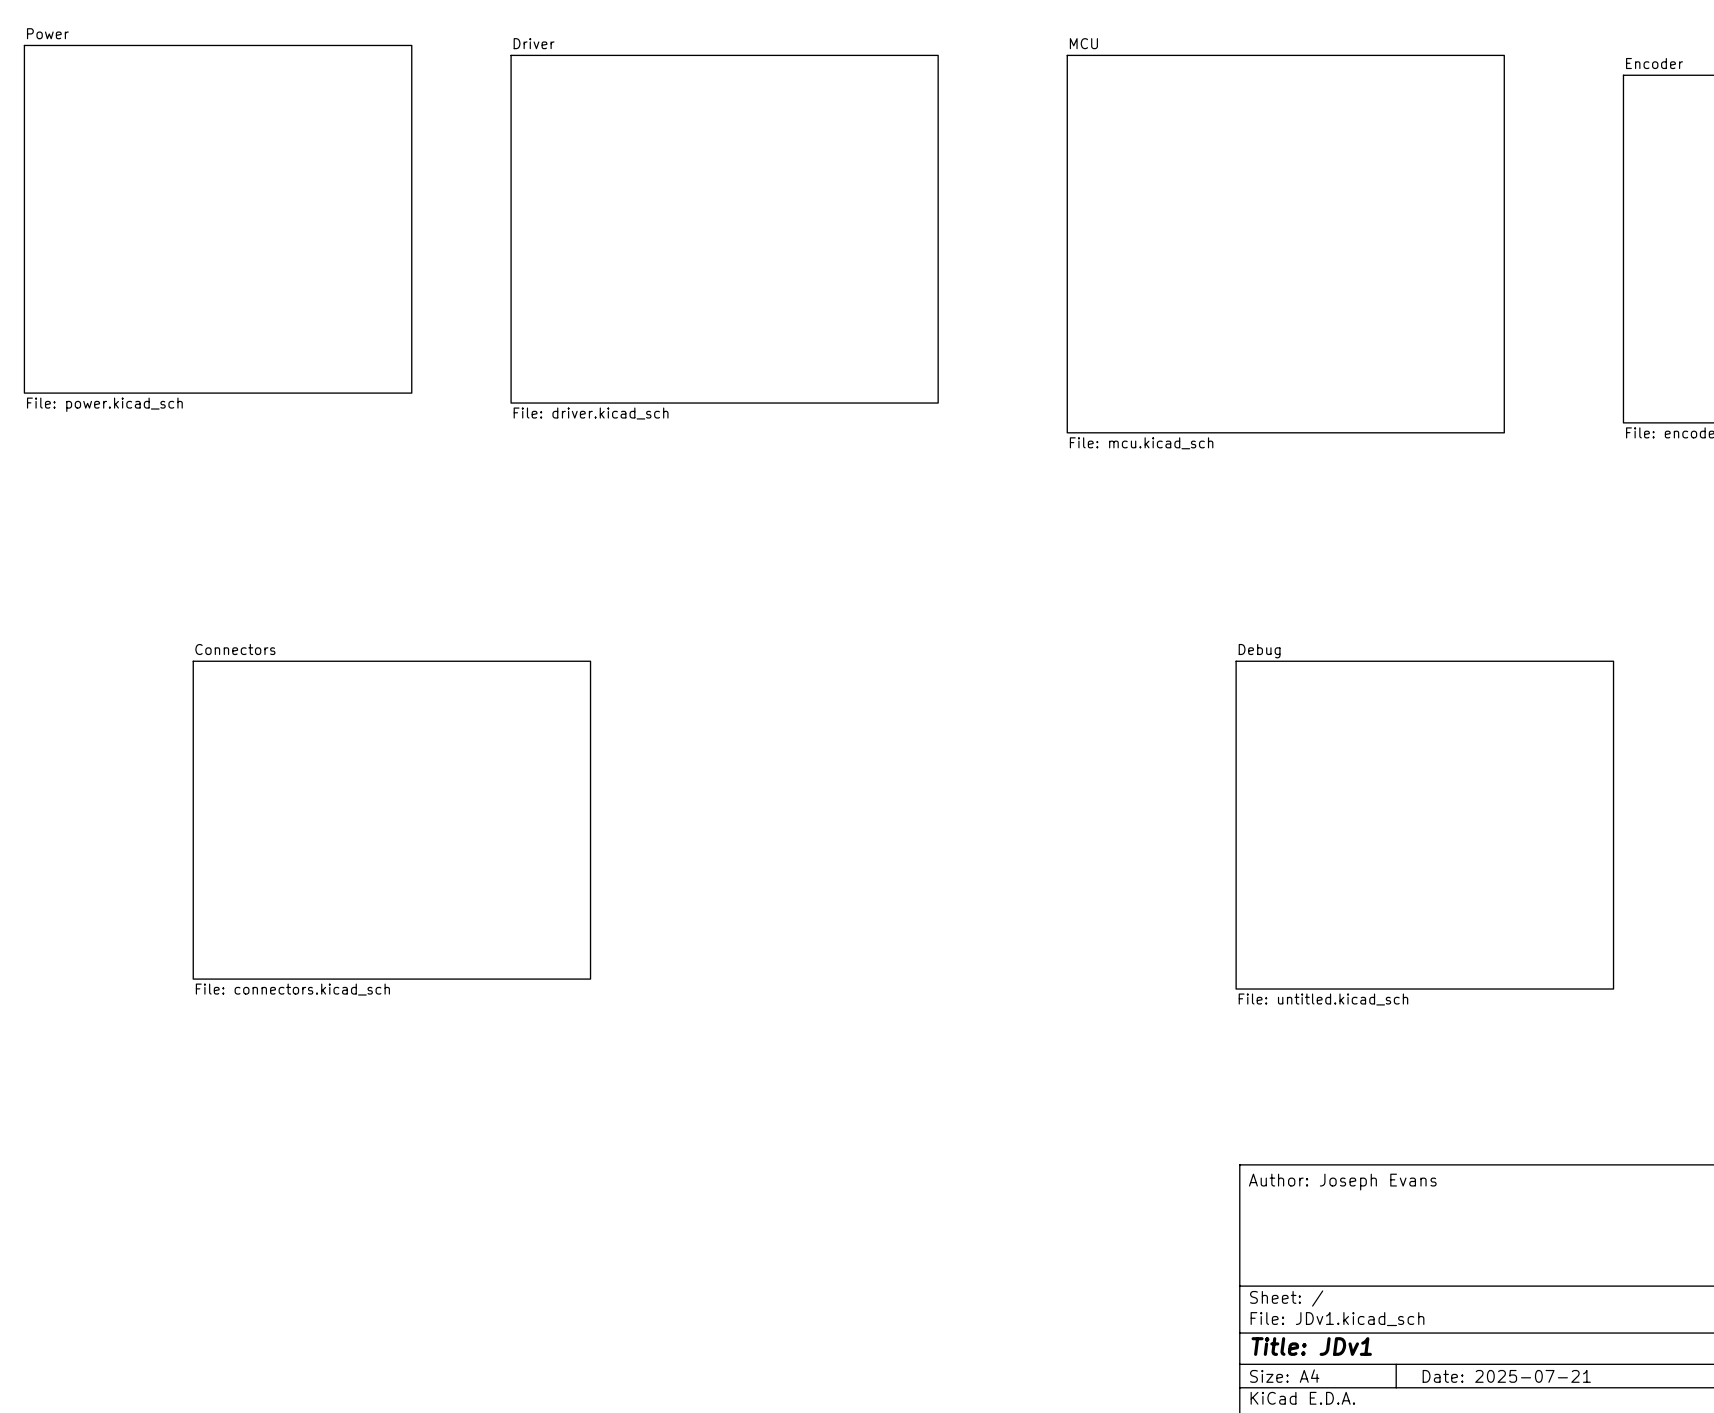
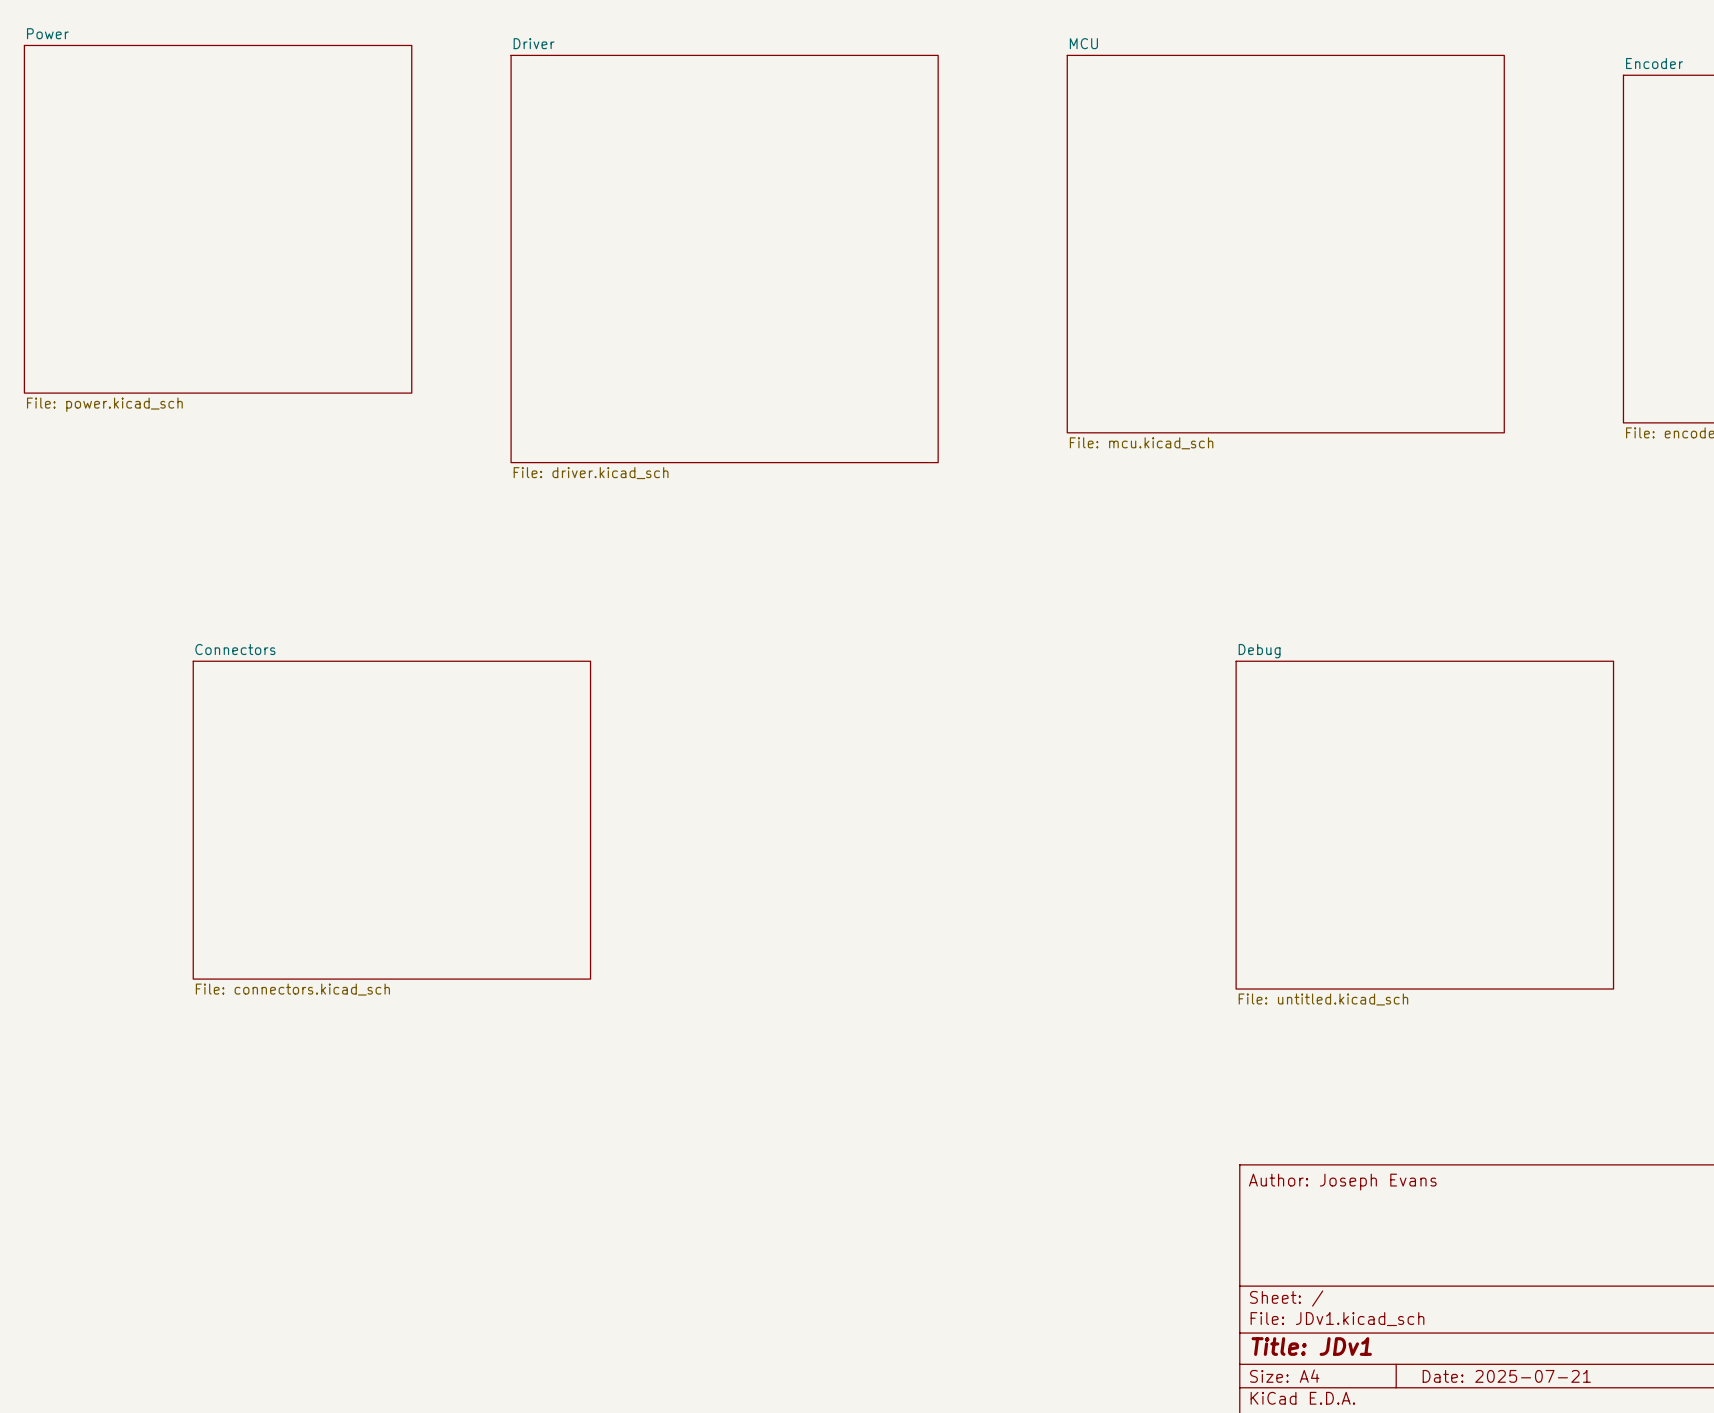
sheet Driver: File: driver.kicad_sch (724, 229) -> none
sheet Driver: none -> File: driver.kicad_sch (724, 259)

